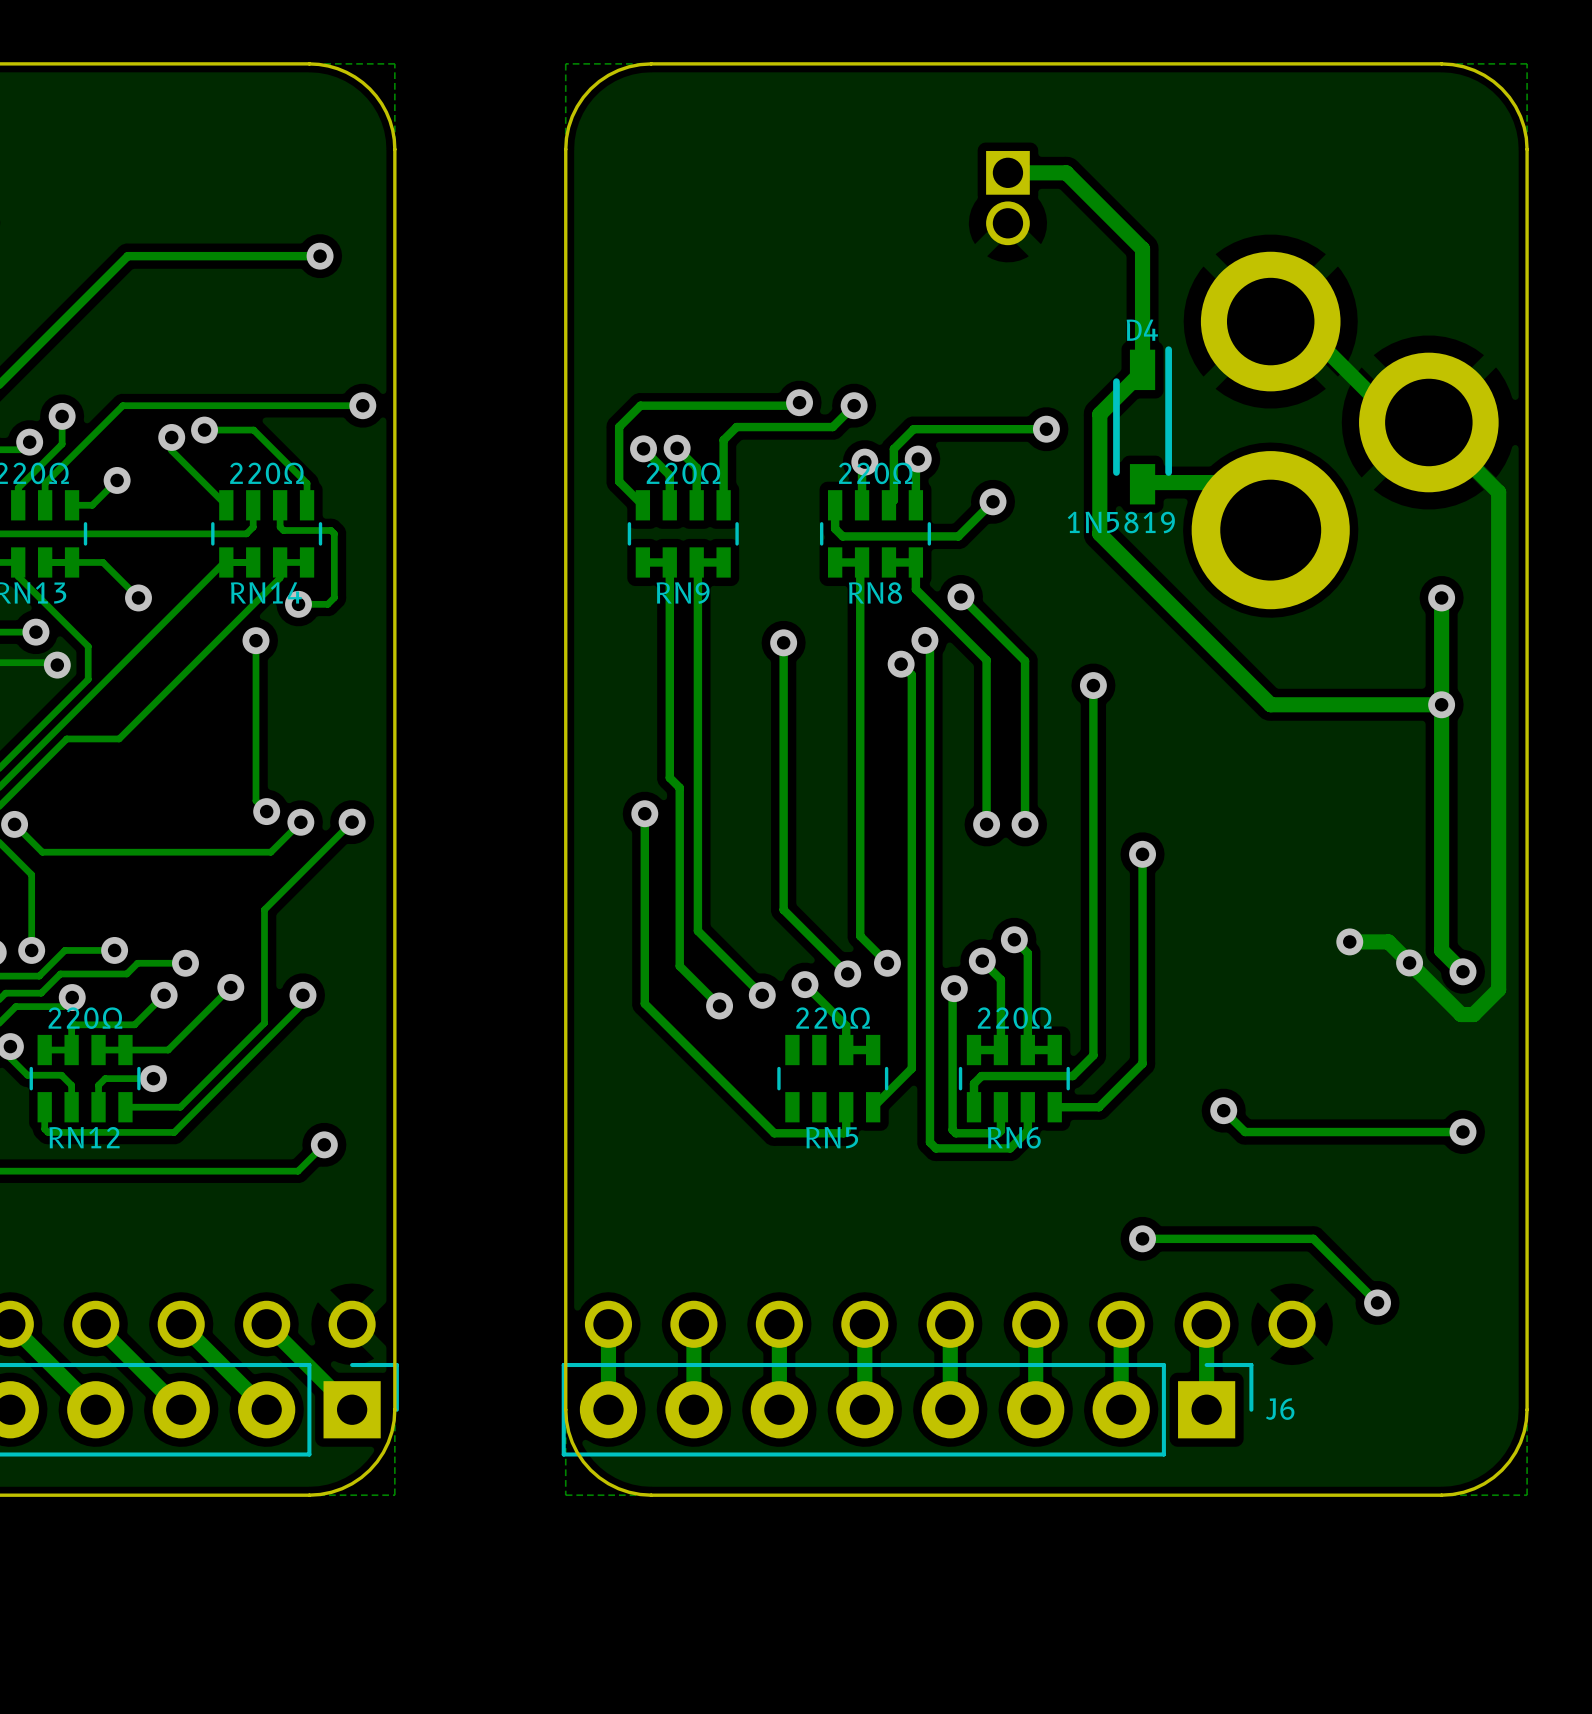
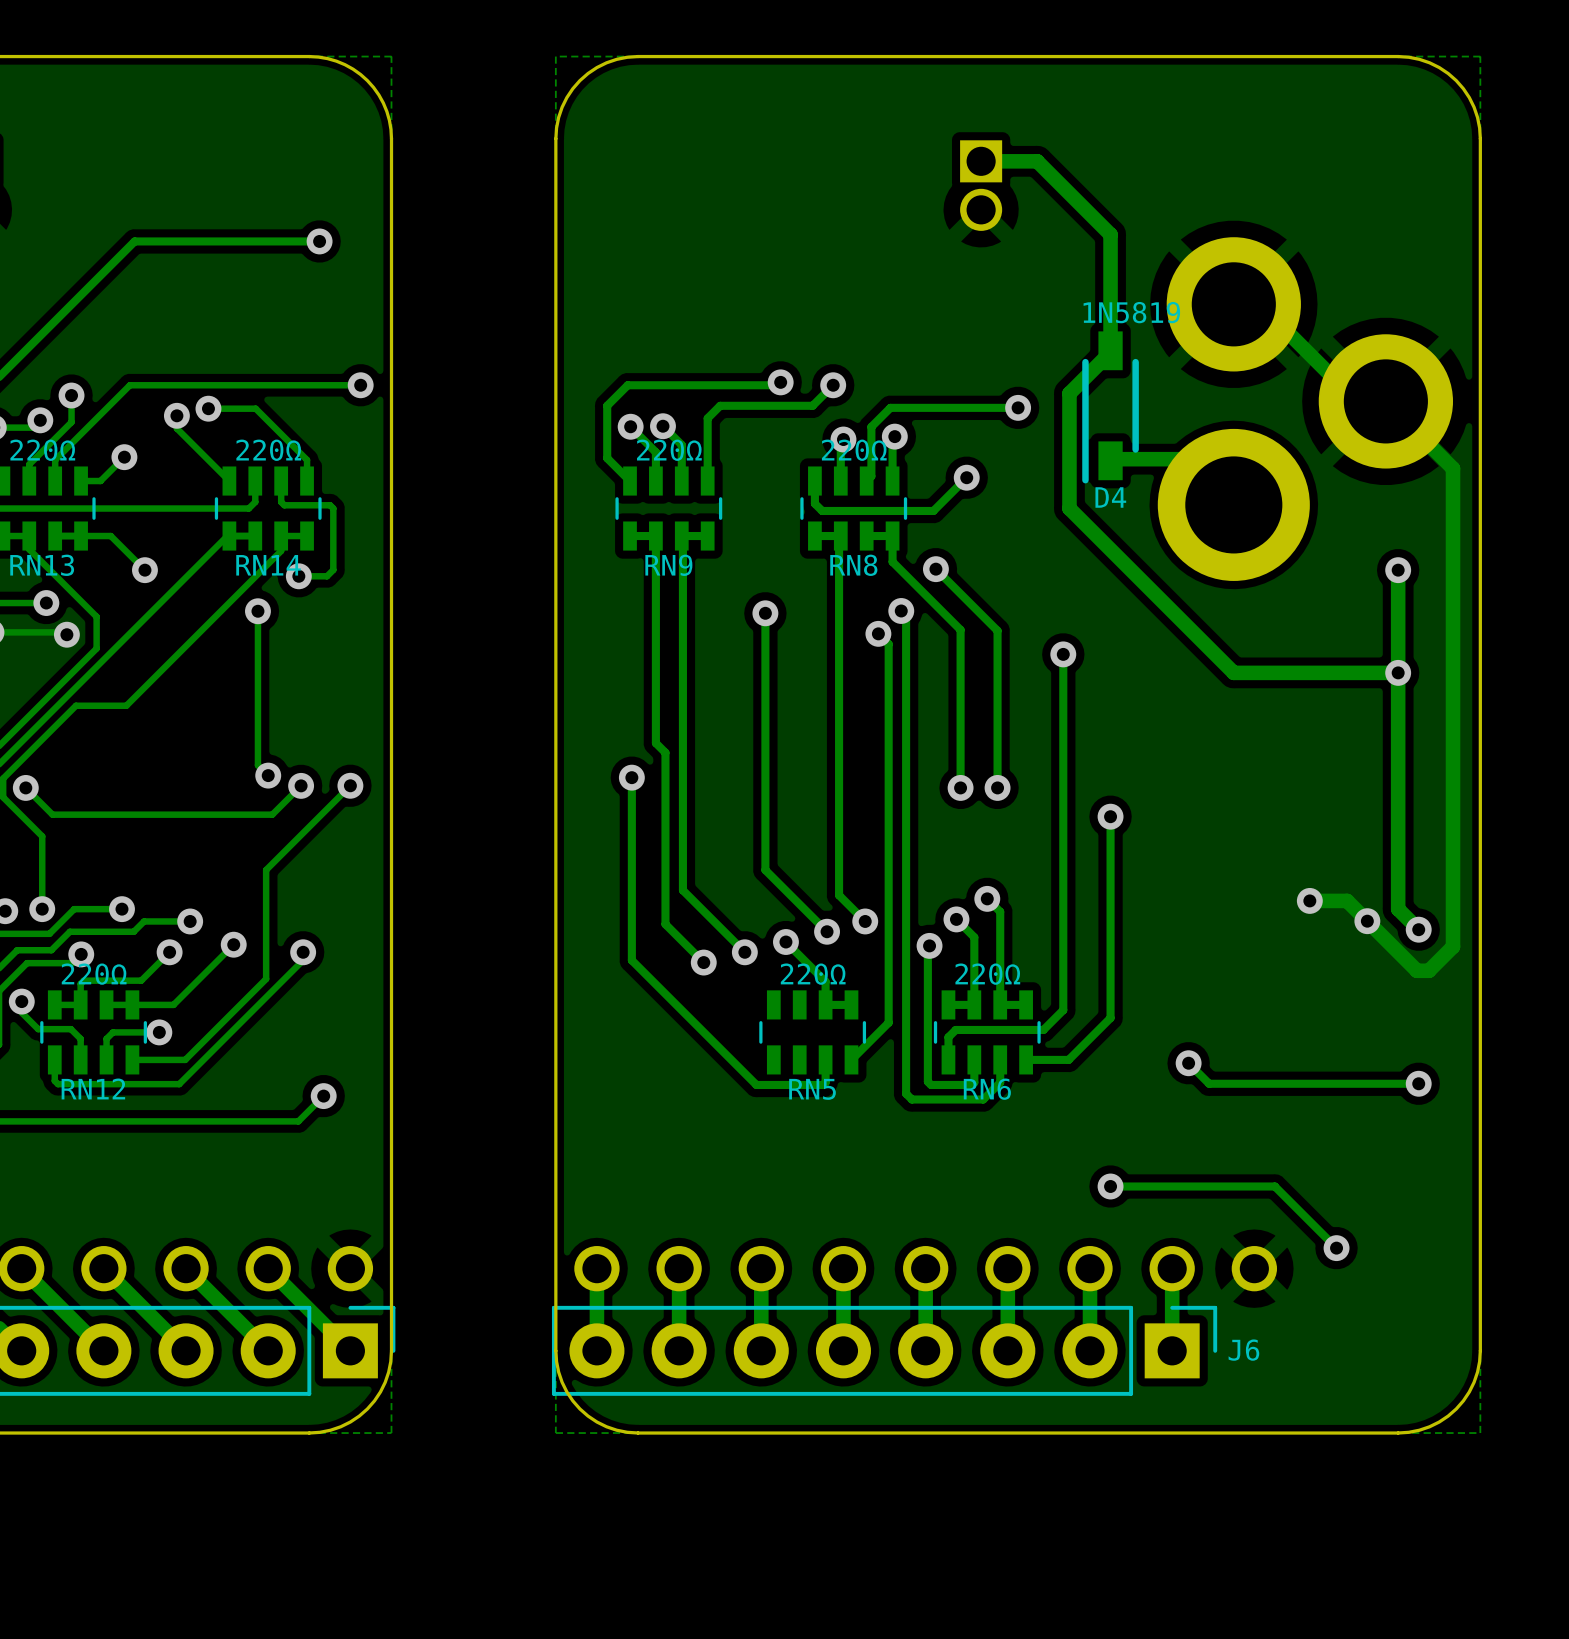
D4 rotation: 0° (1142, 425) -> 180° (1110, 407)

